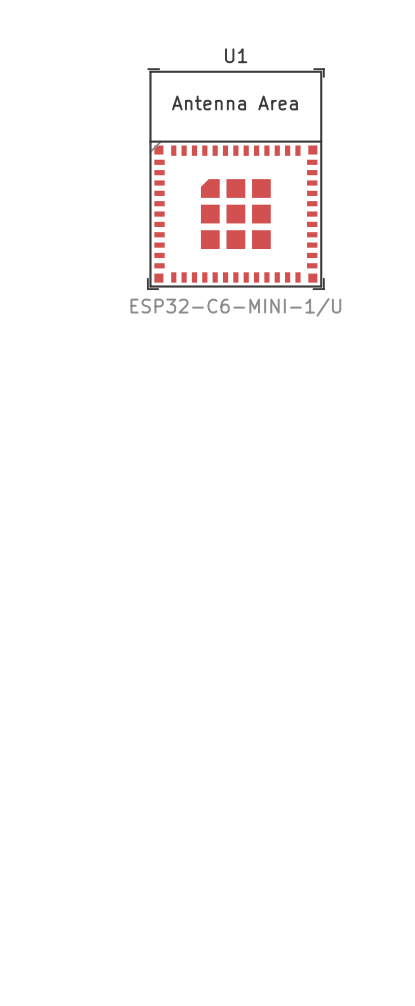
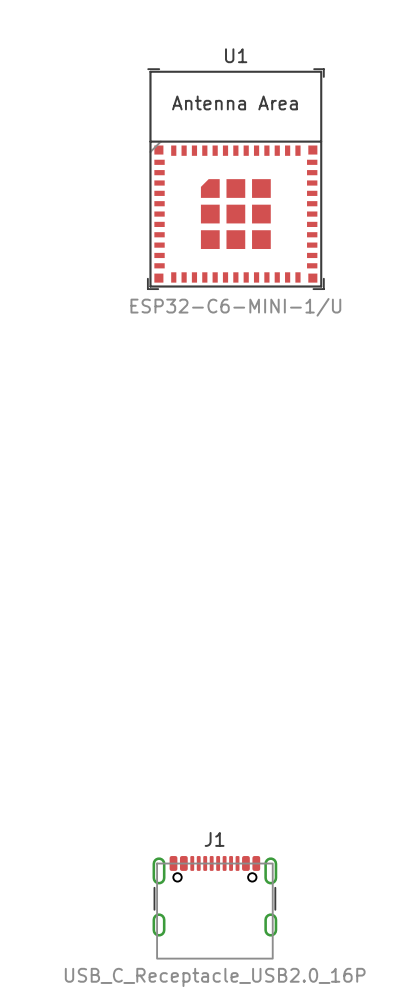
J1: none -> USB_C_Receptacle_USB2.0_16P (214, 907)

